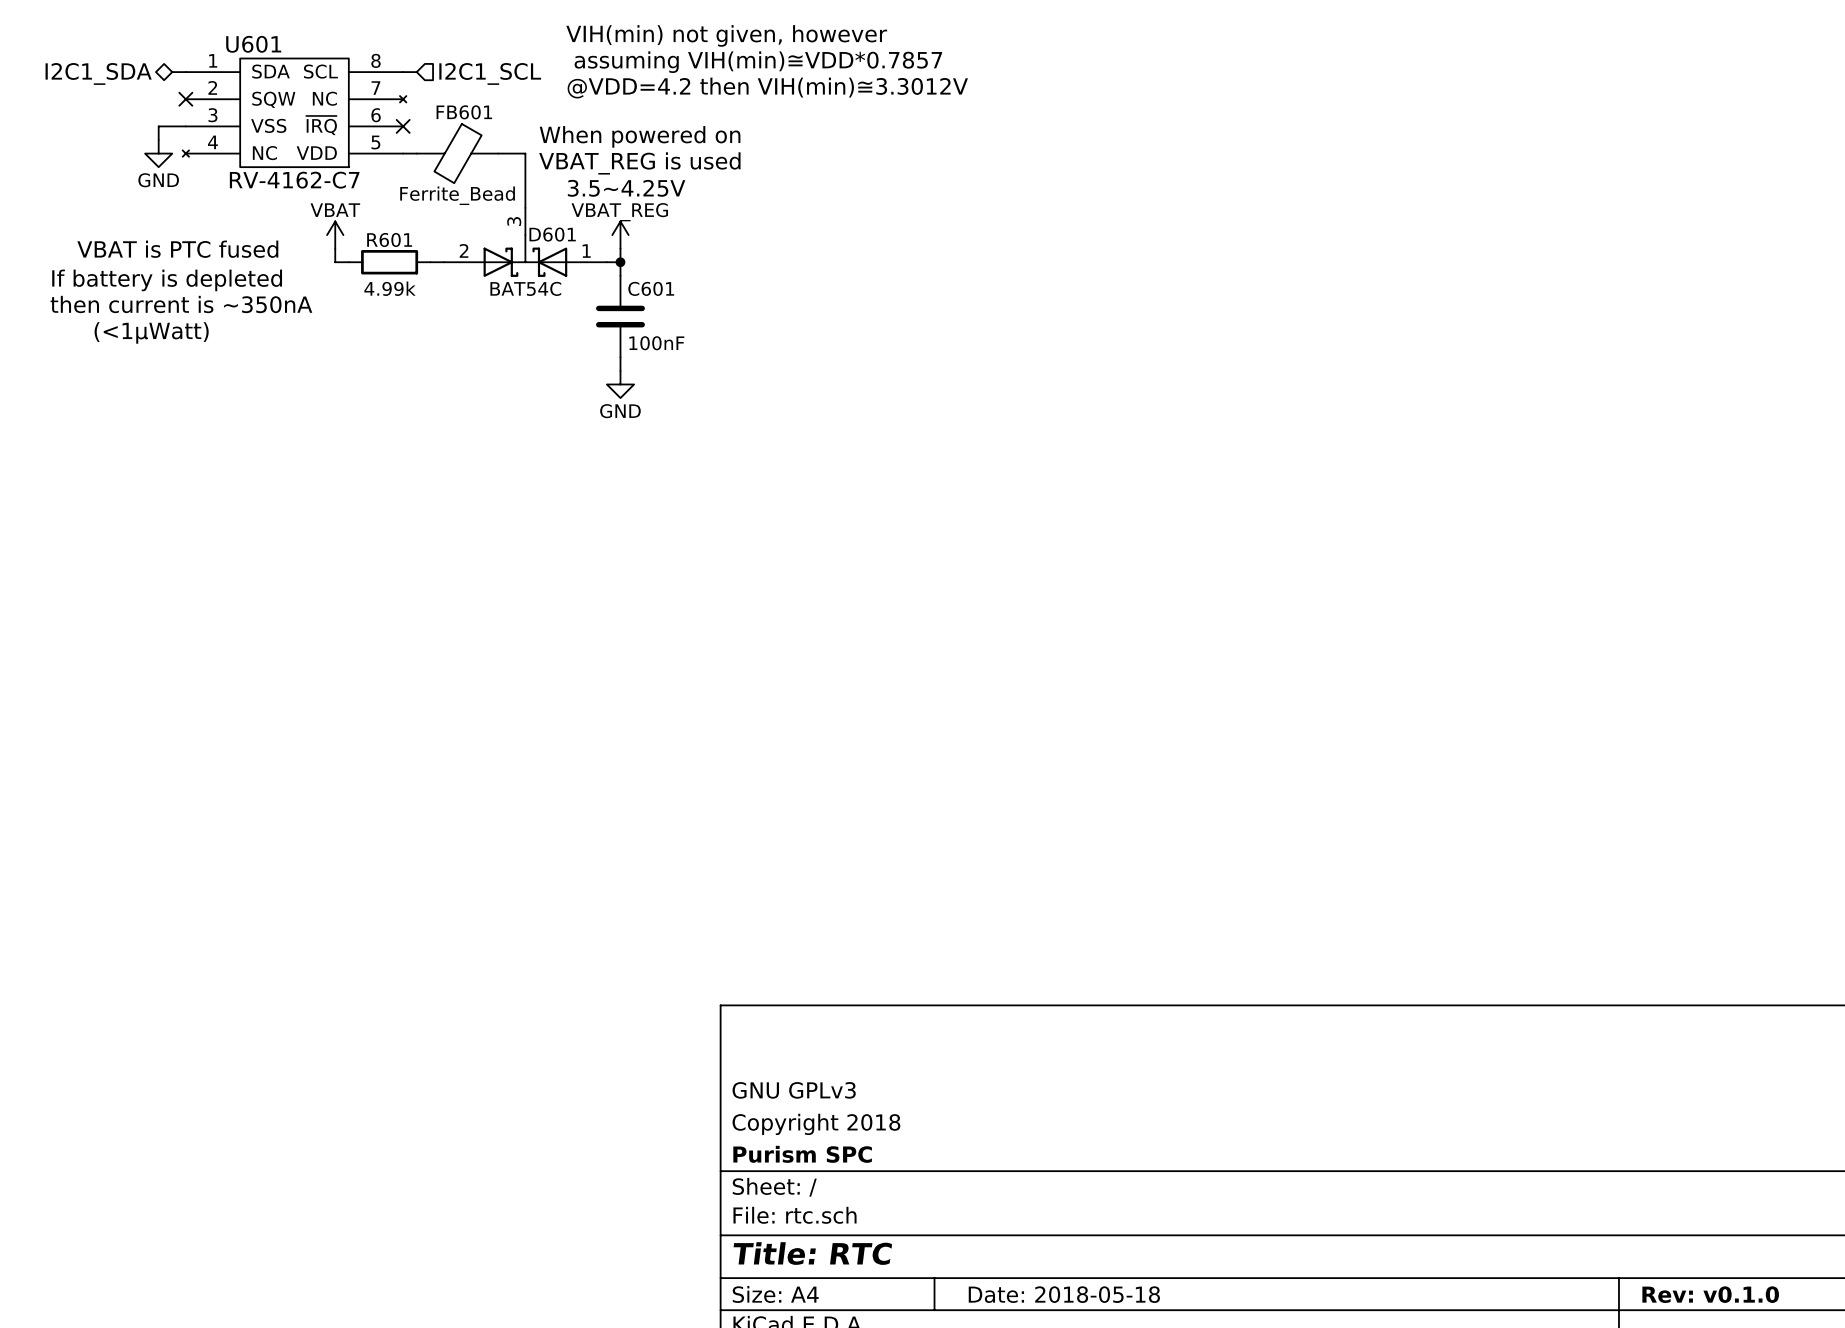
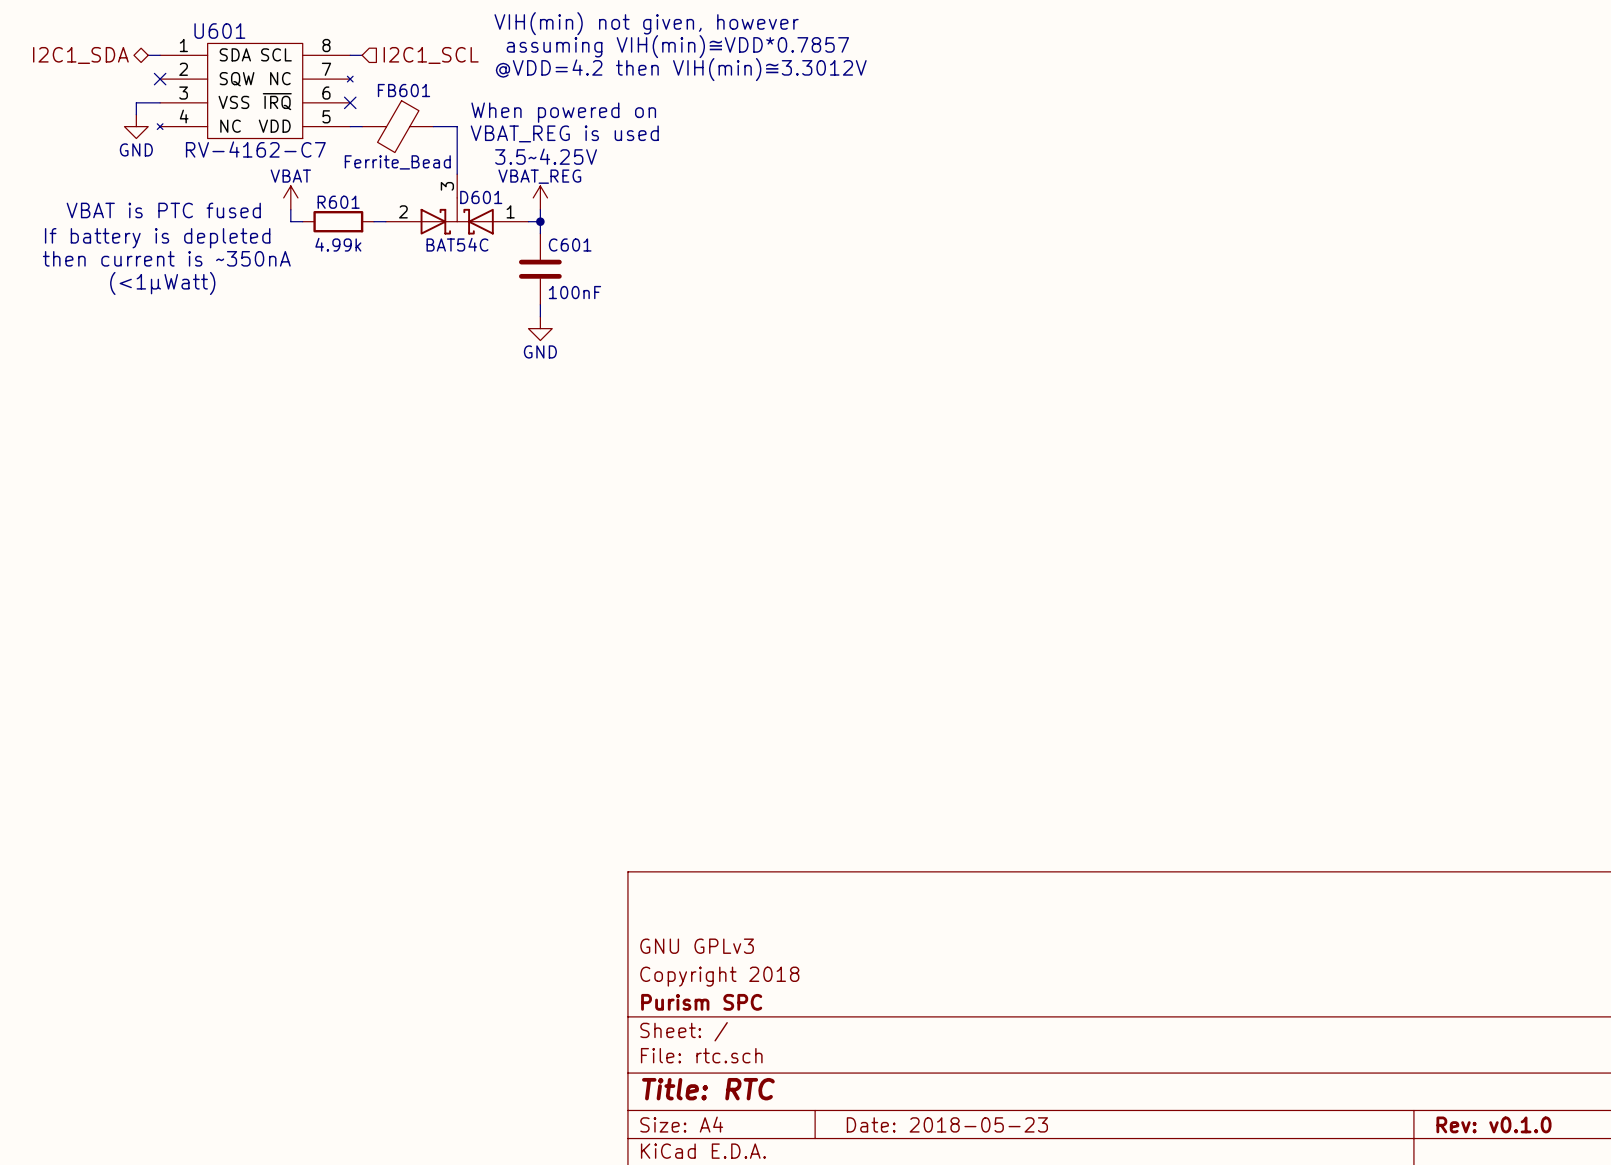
title block: Date: 2018-05-18 (1064, 1294) -> Date: 2018-05-23 (947, 1124)

